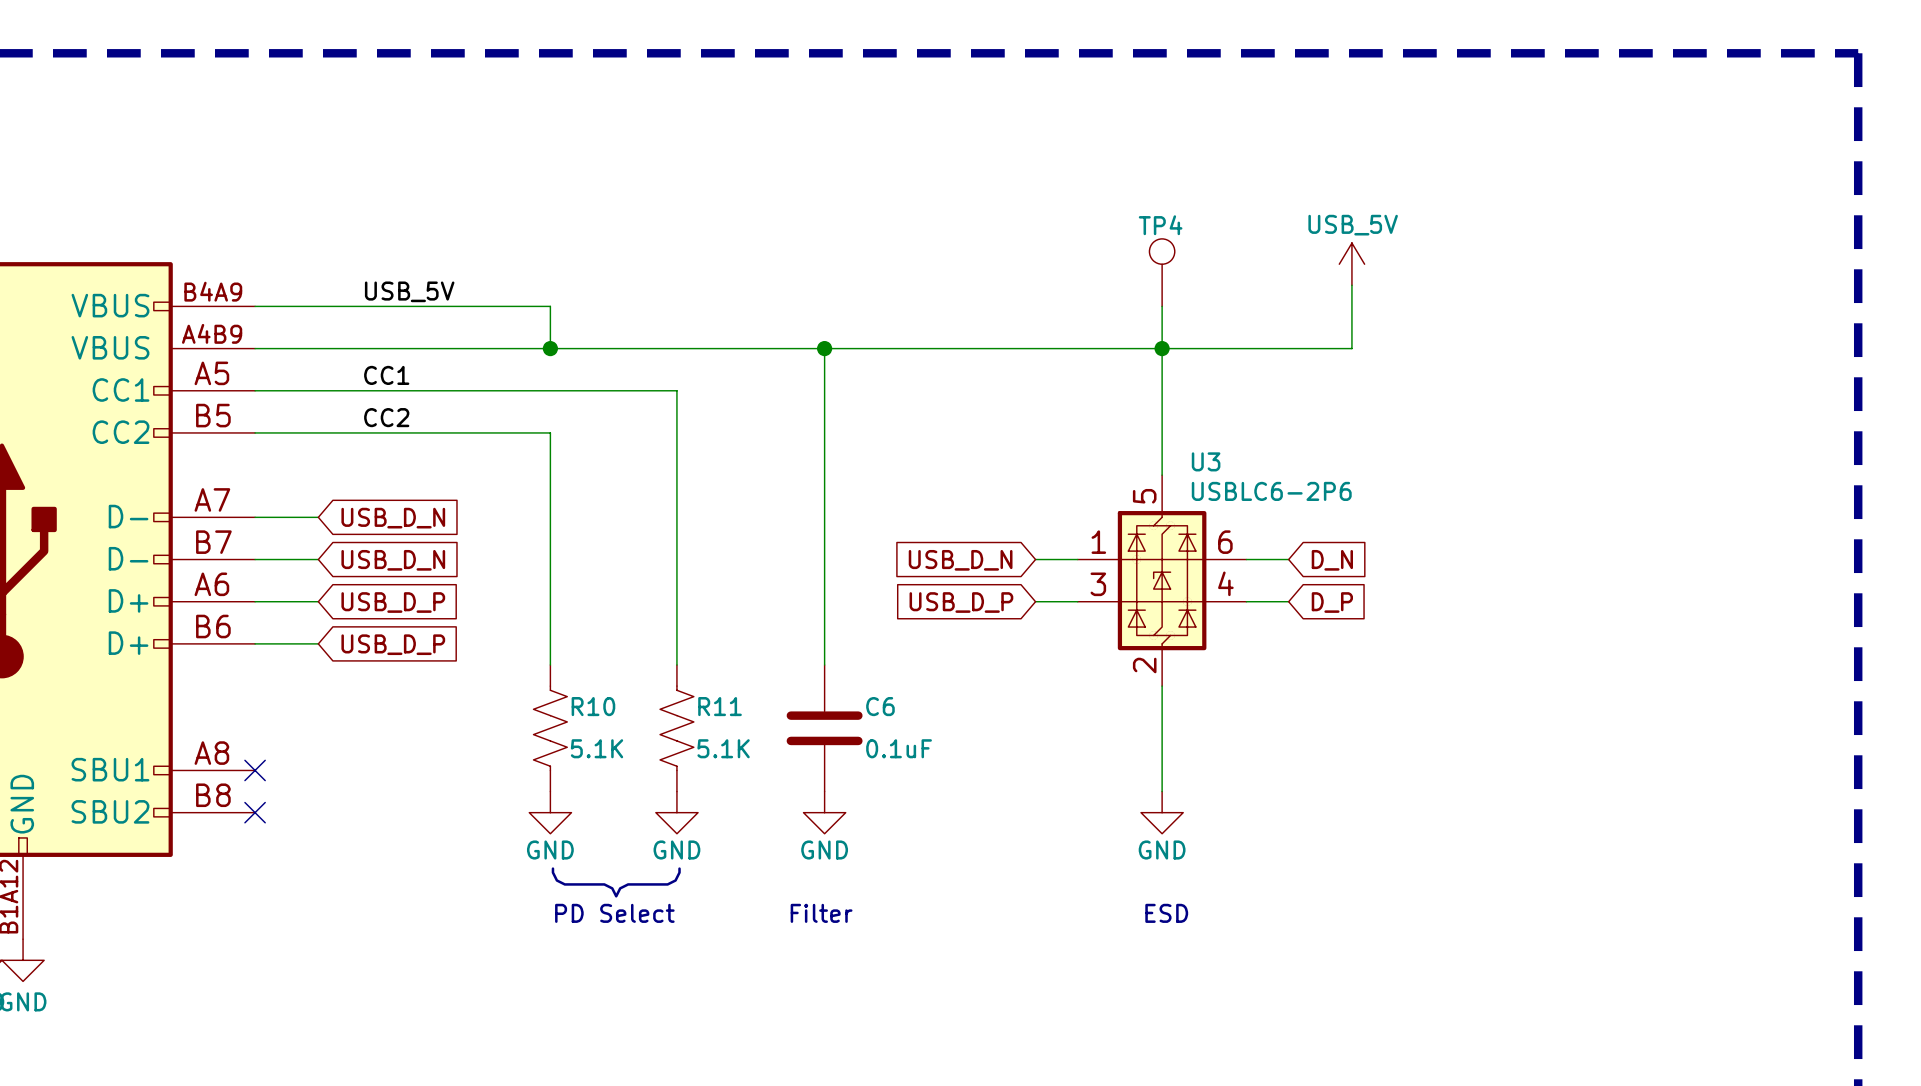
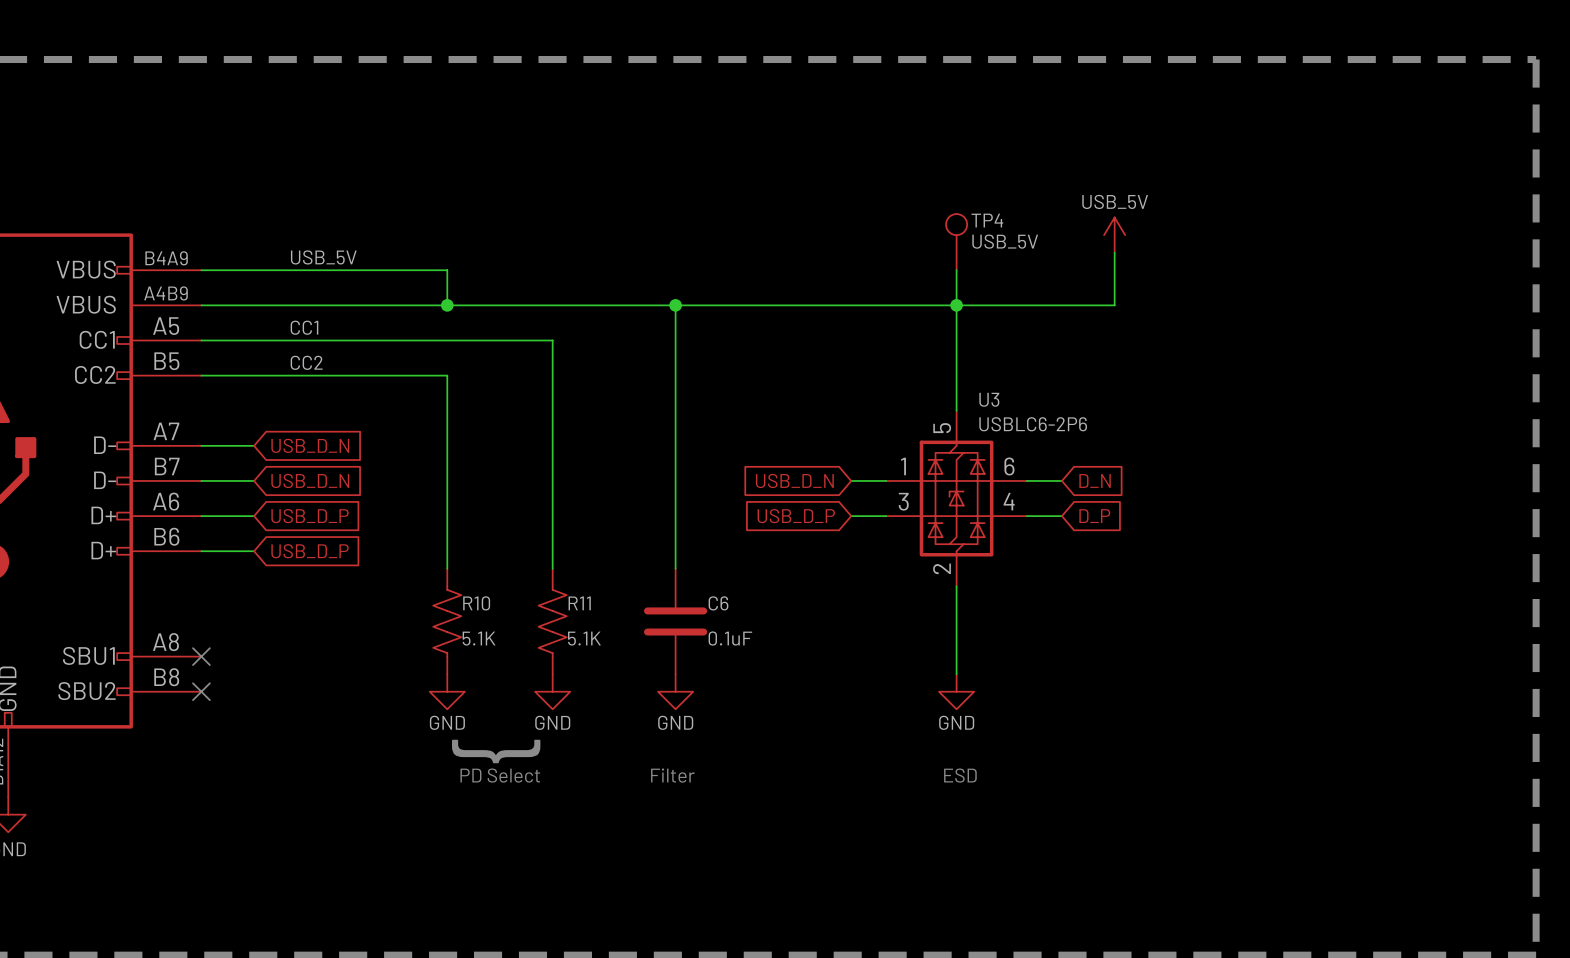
TP4 name position: TP4 (1160, 225) -> TP4 (987, 220)
TP4 value: none -> USB_5V (1005, 241)

